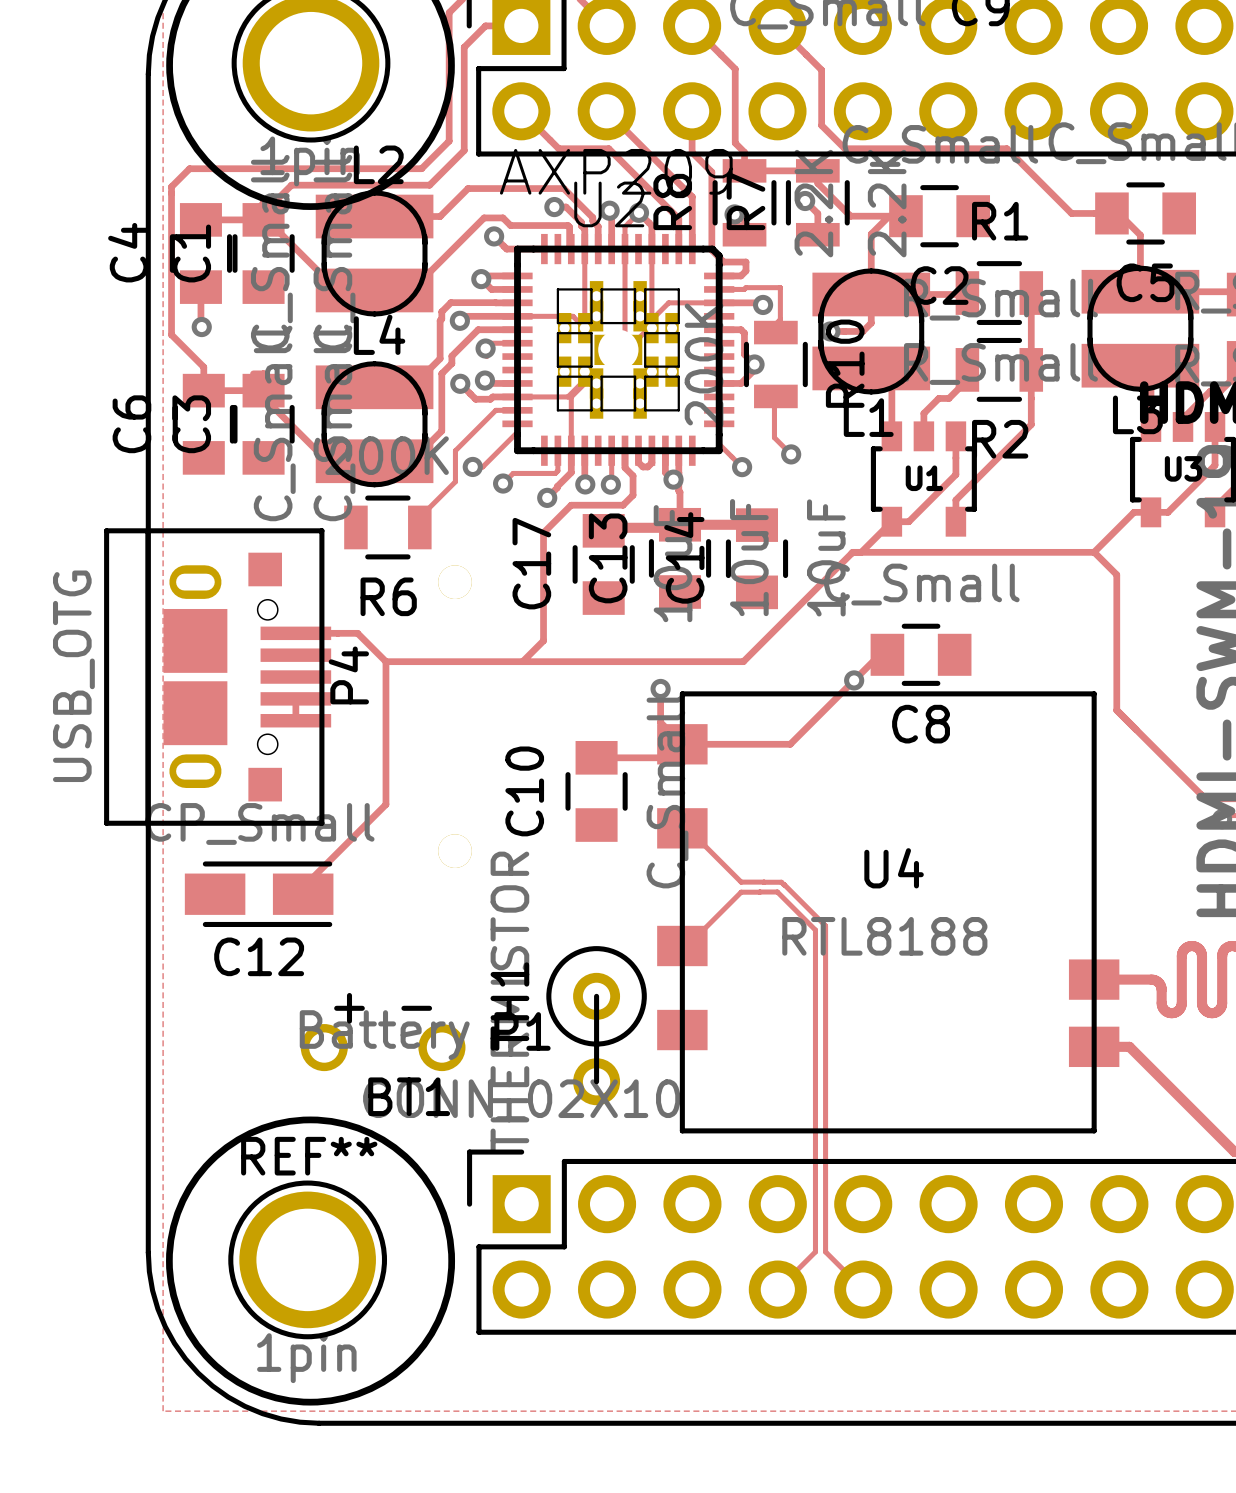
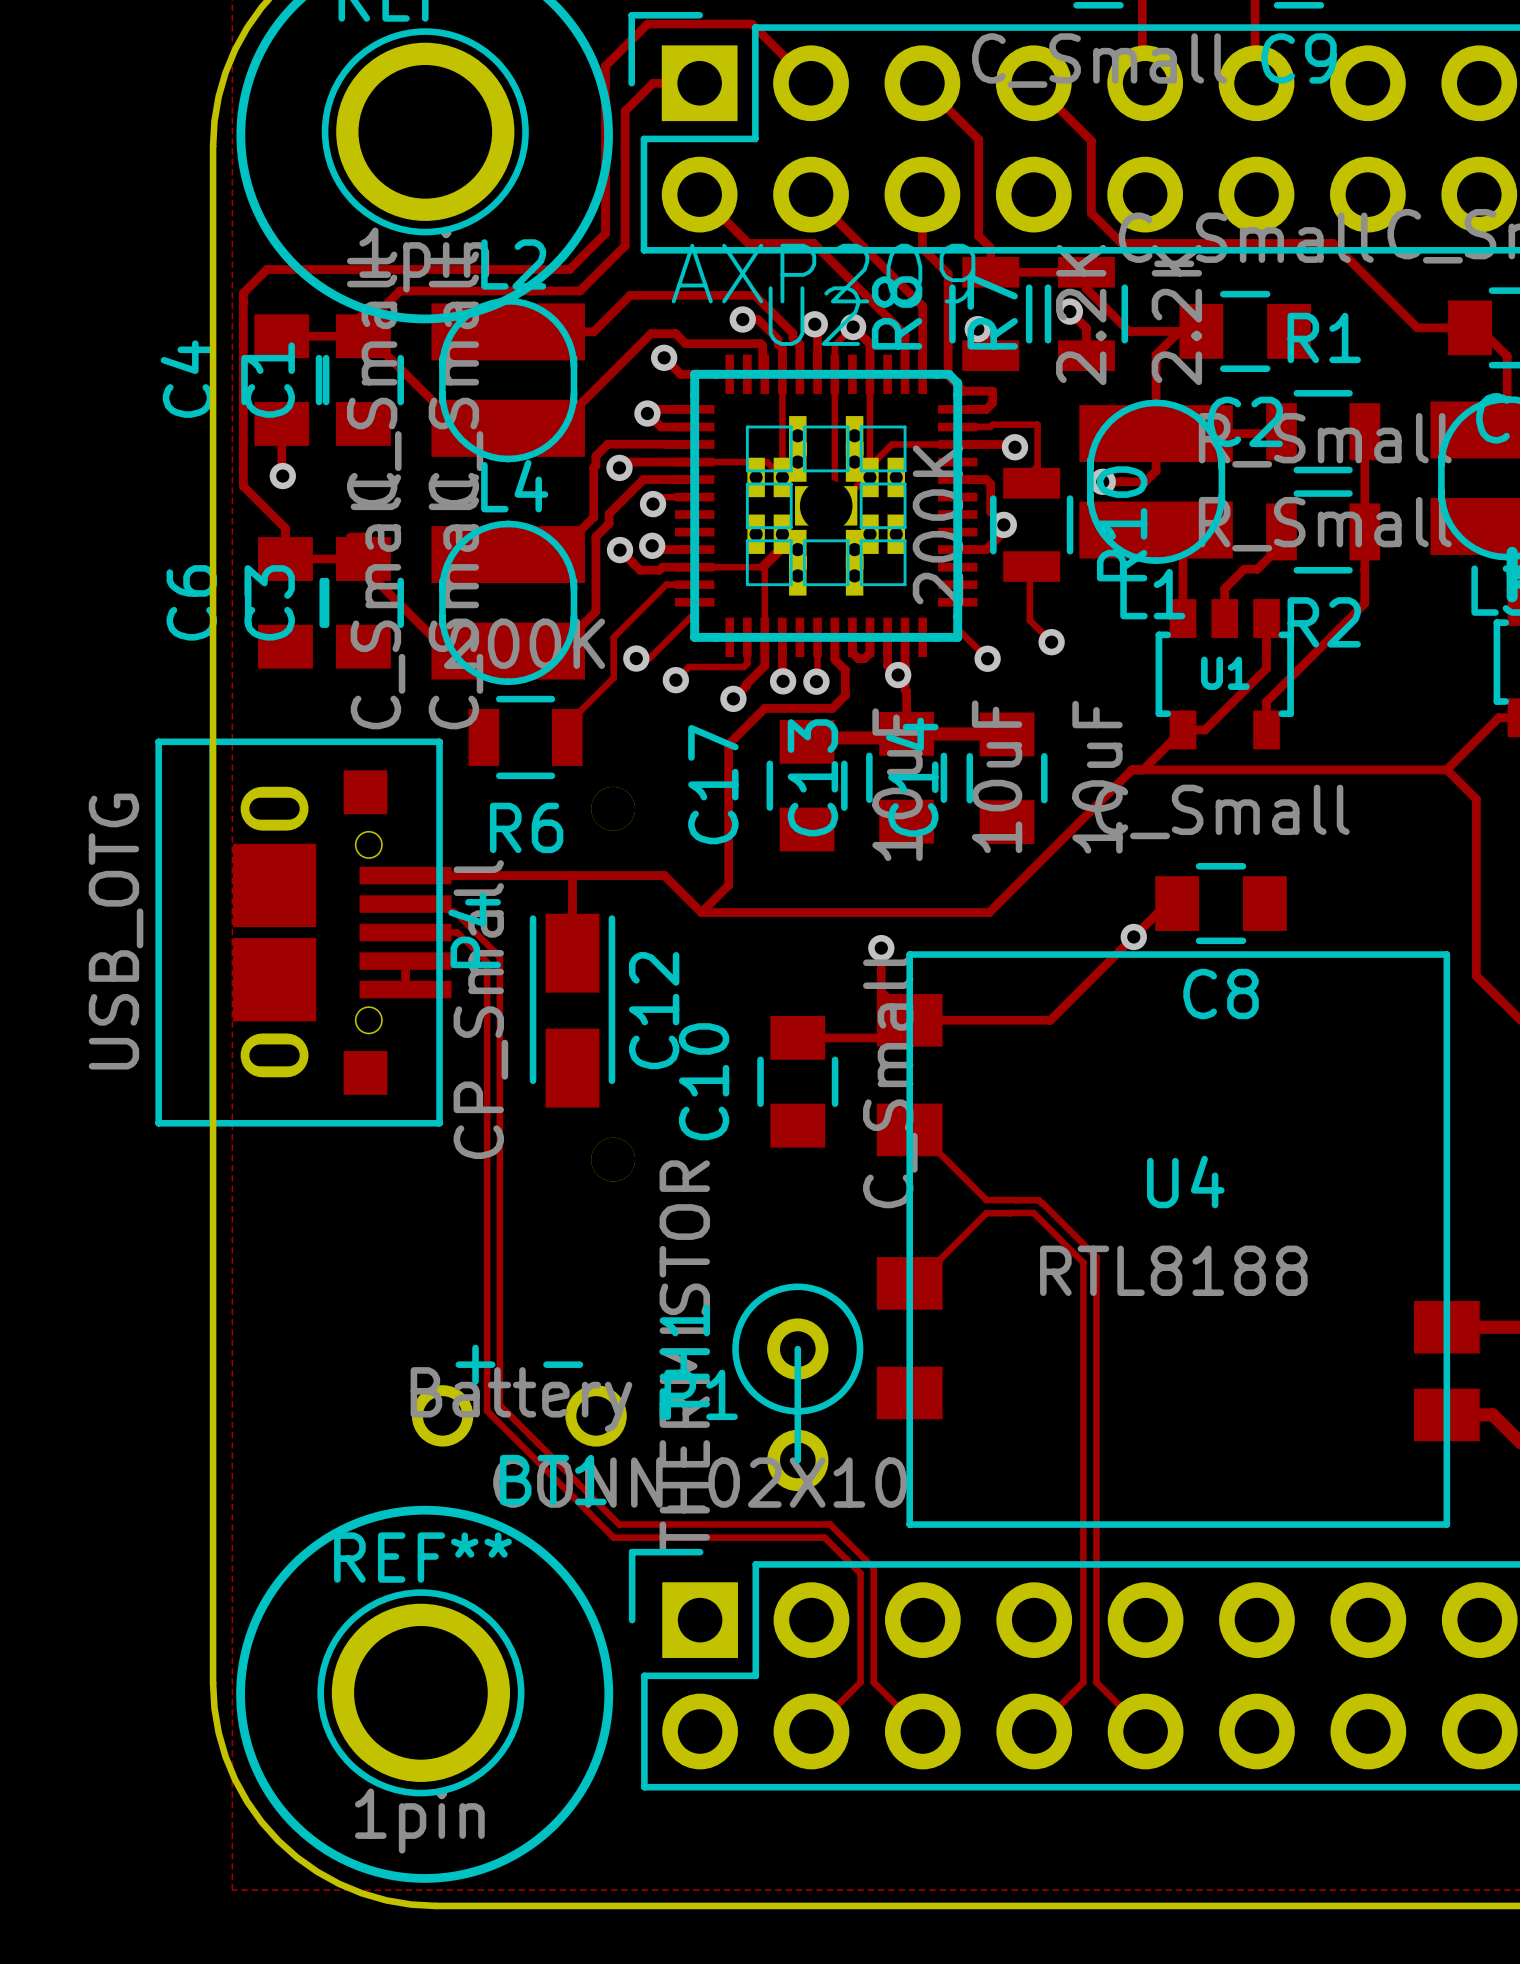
track: (357, 633) (385, 661) -> none
track: none -> (572, 875) (572, 953)
track: none -> (405, 904) (442, 904) (450, 911) (454, 911) (499, 957) (499, 1405) (619, 1524) (830, 1524) (873, 1568) (873, 1682) (922, 1731)
track: (385, 661) (522, 661) -> (486, 875) (664, 875) (701, 912)
track: (385, 661) (385, 804) (302, 888) (302, 895) -> none
track: none -> (405, 932) (457, 932) (487, 962) (487, 1410) (613, 1537) (824, 1537) (860, 1573) (860, 1682) (811, 1731)
C12 rotation: 0° (259, 894) -> 90° counterclockwise (572, 1010)
C12 position: (259, 894) -> (572, 1010)

